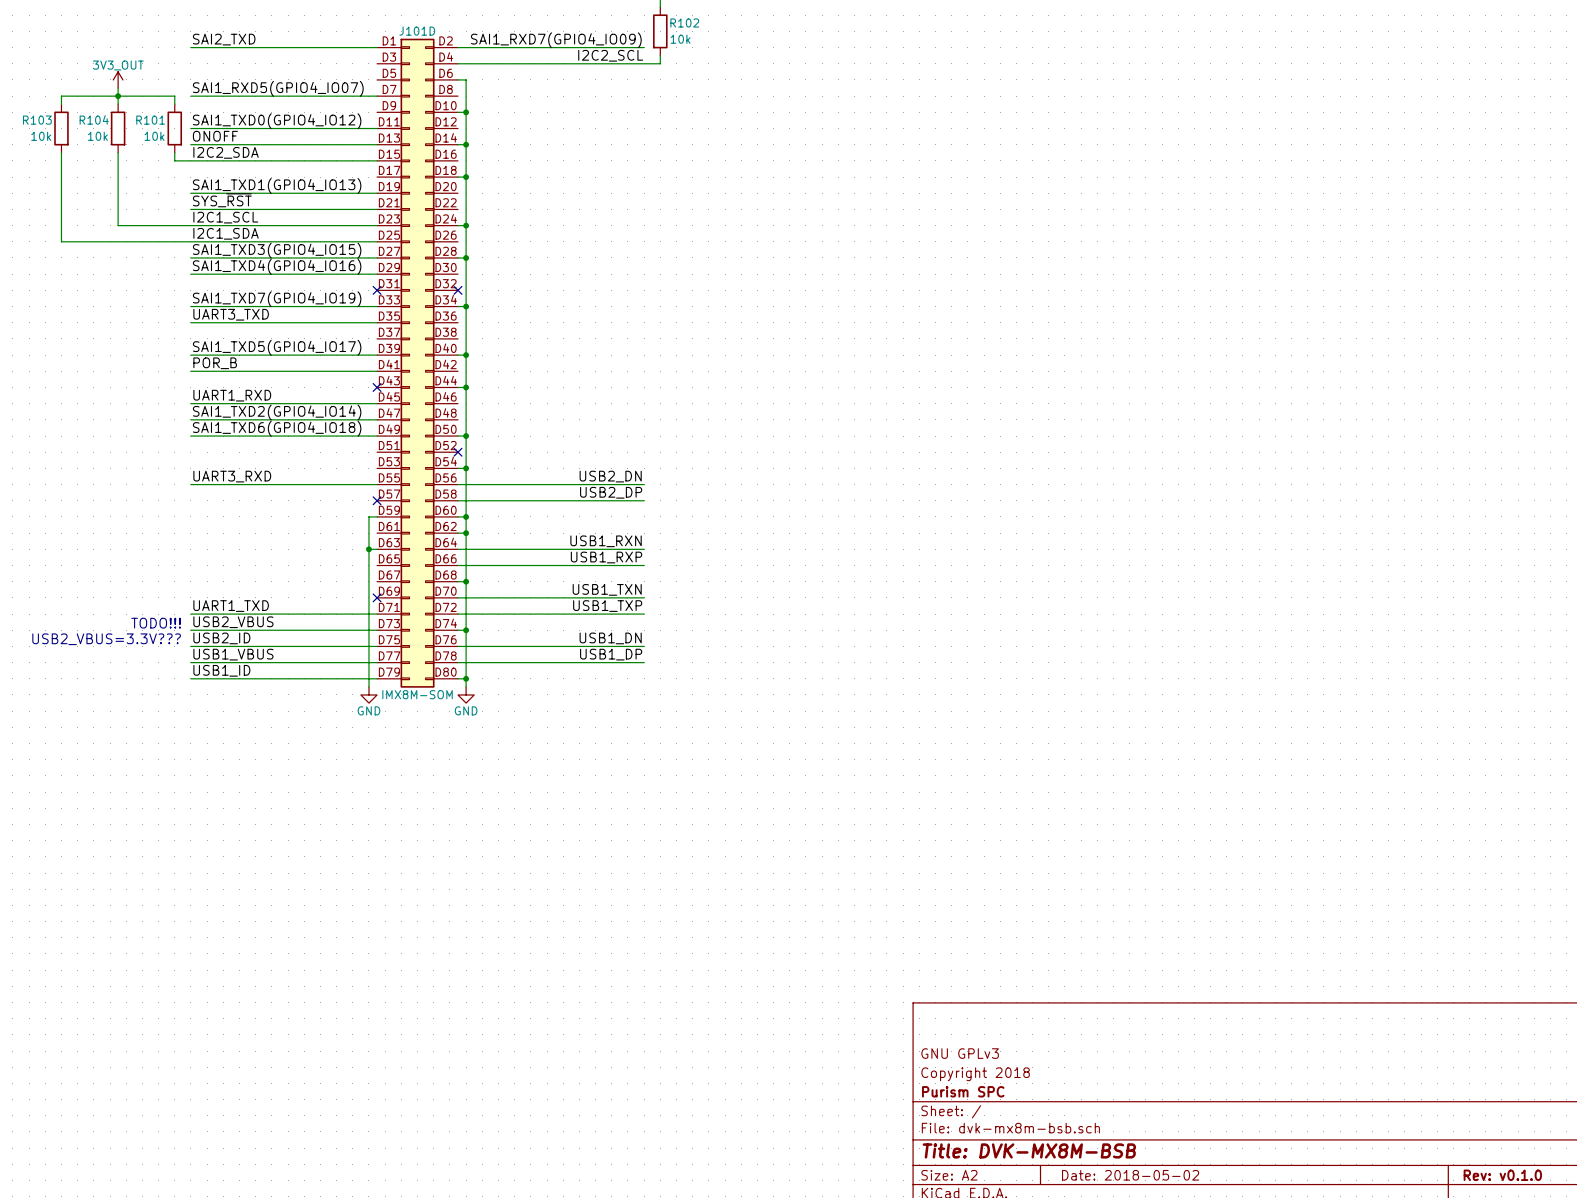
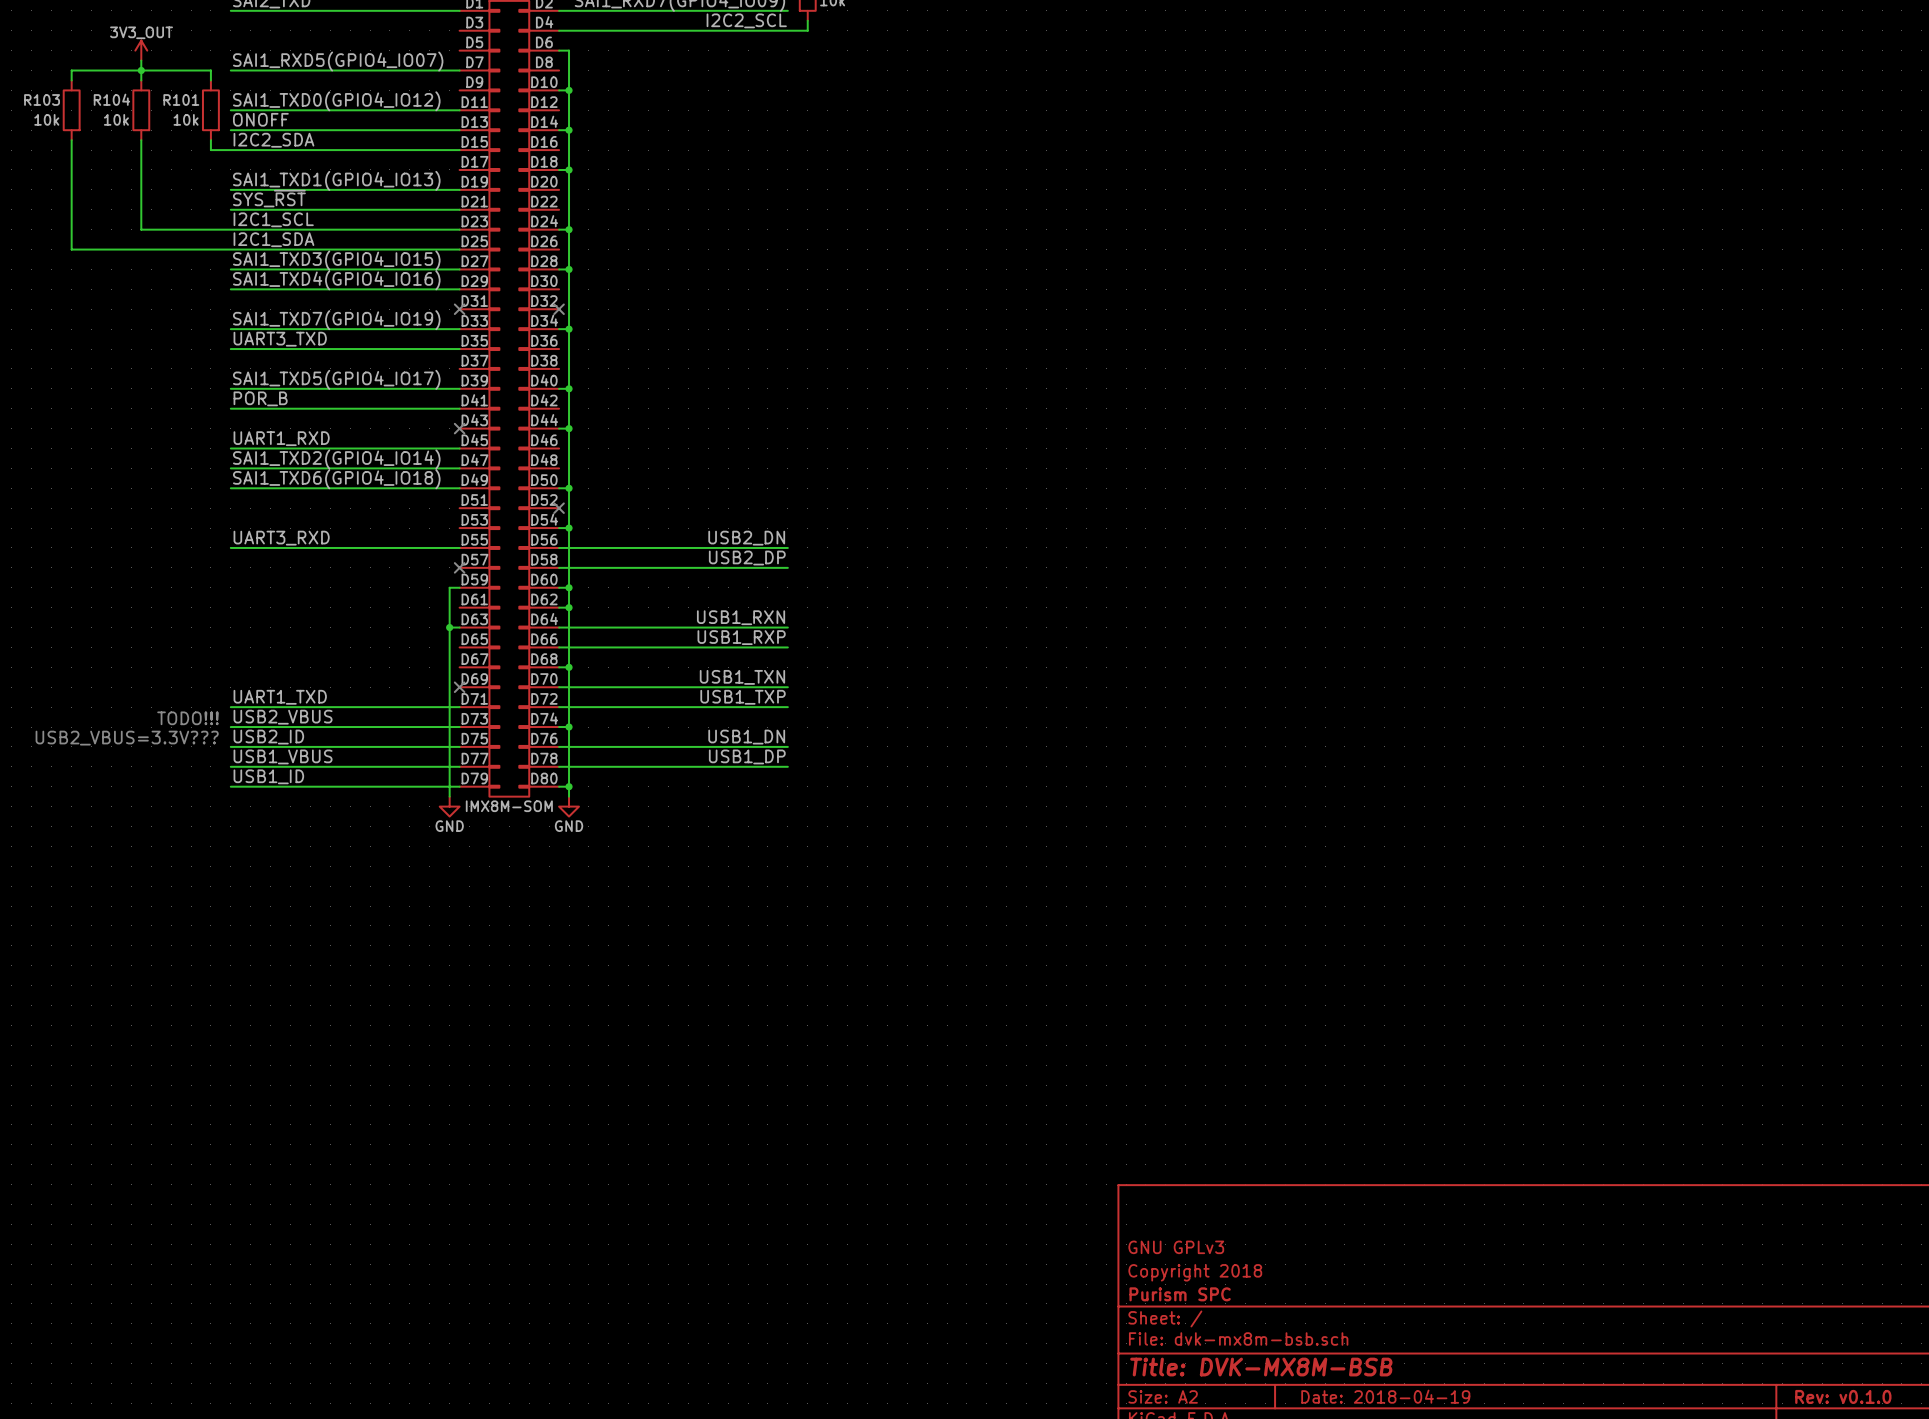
title block: Date: 2018-05-02 (1130, 1175) -> Date: 2018-04-19 (1385, 1396)

